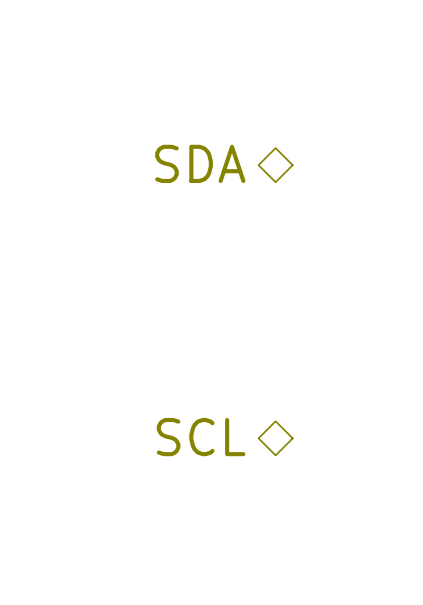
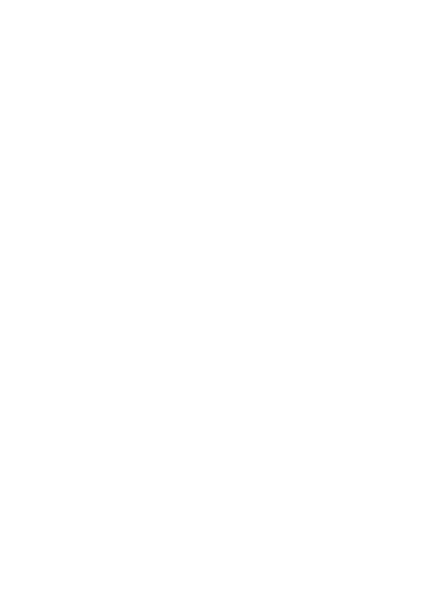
hierarchical label: SDA (200, 163) -> none
hierarchical label: SCL (201, 437) -> none

